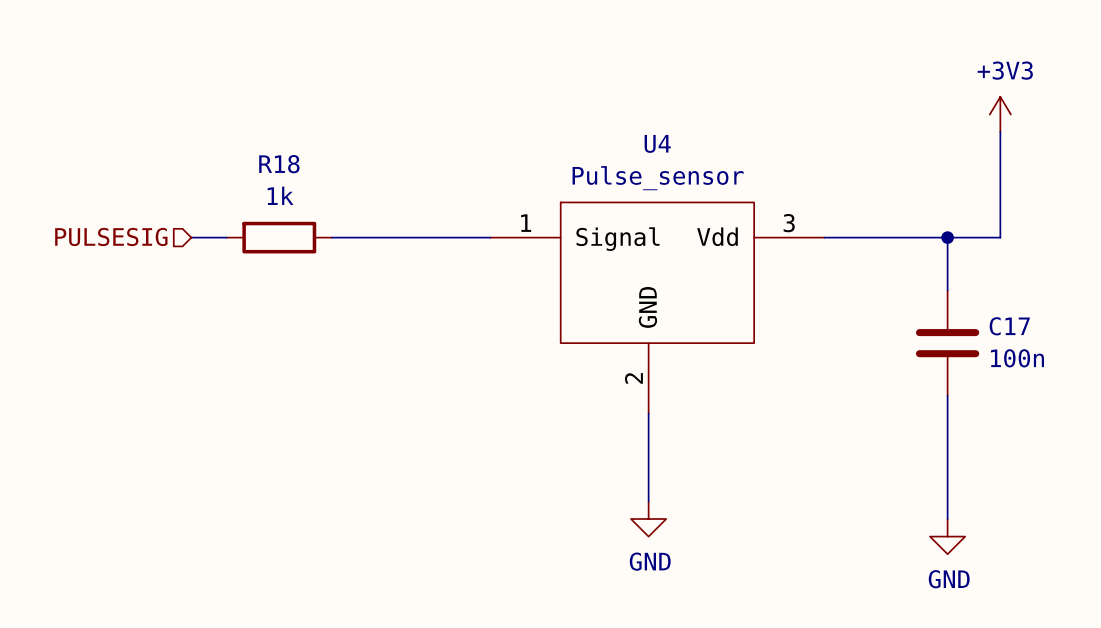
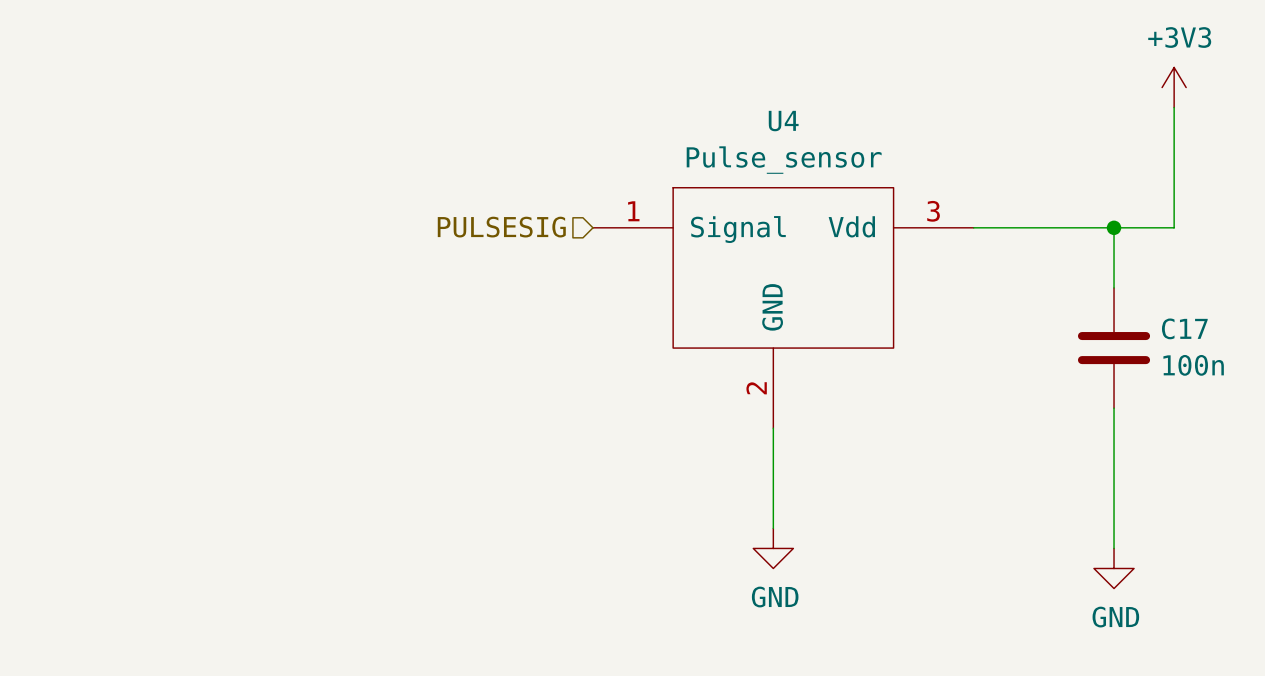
hierarchical label position: PULSESIG (111, 236) -> PULSESIG (501, 227)
wire: (191, 237) (226, 237) -> none
R18: 1k (279, 237) -> none
wire: (332, 237) (490, 237) -> none

